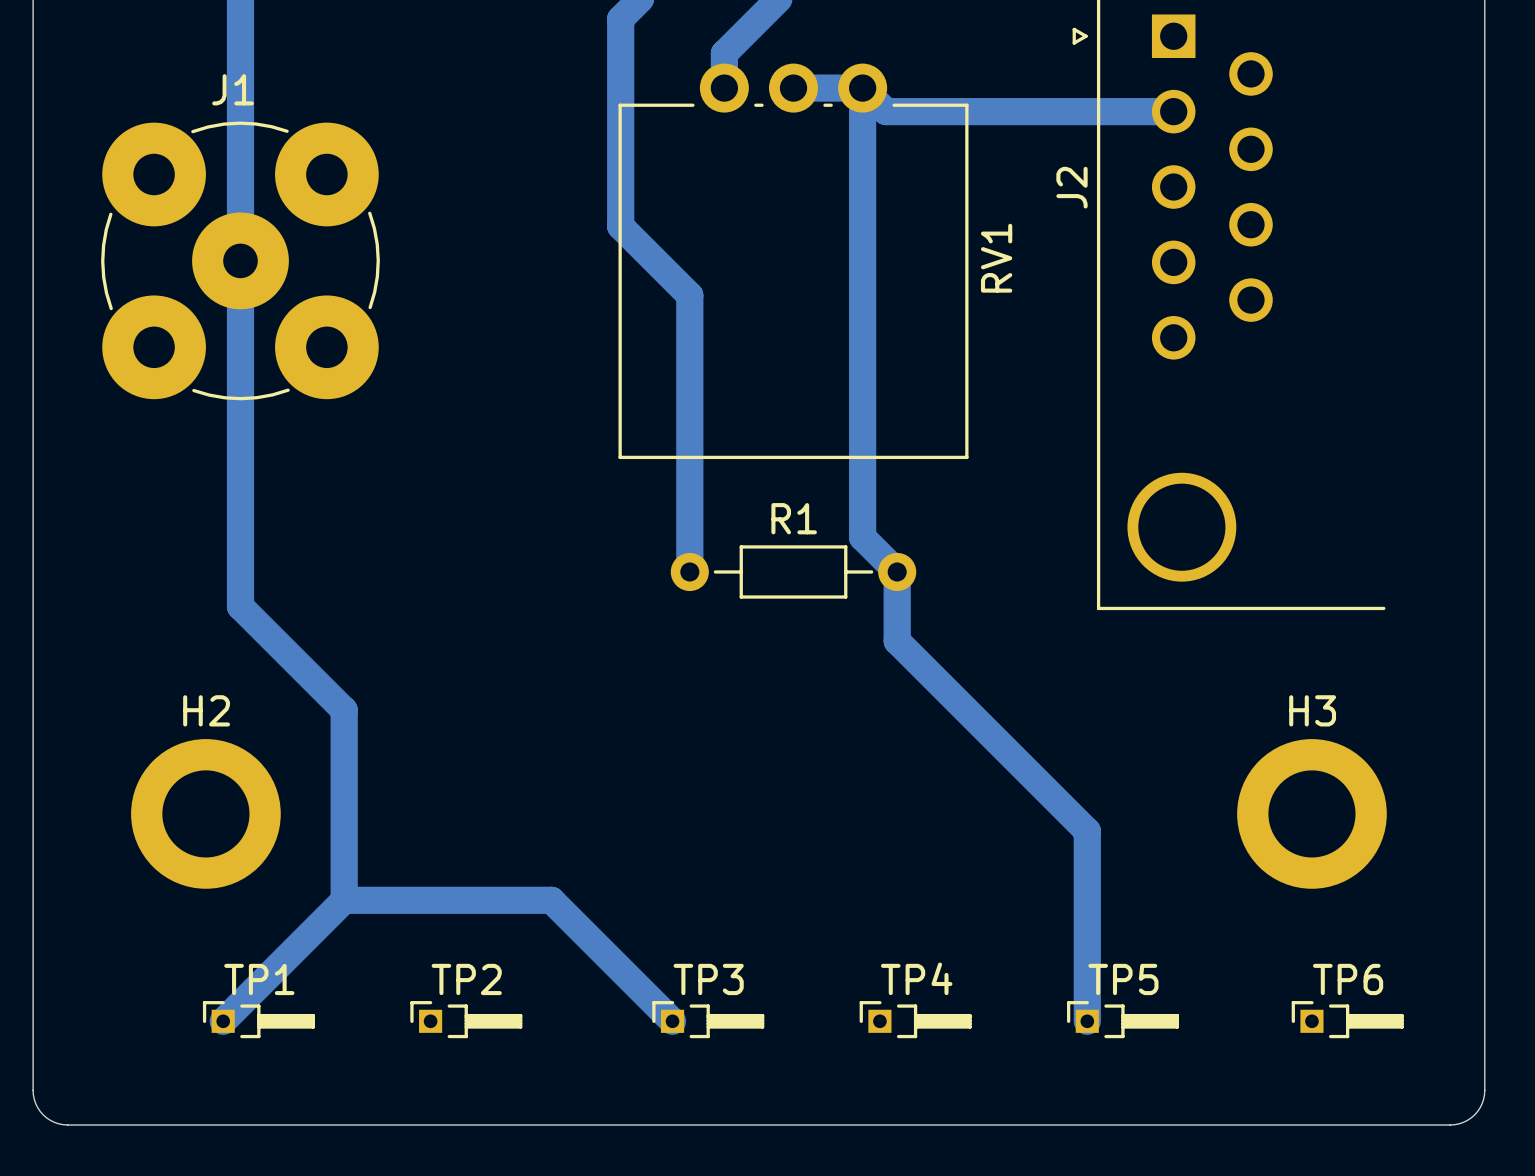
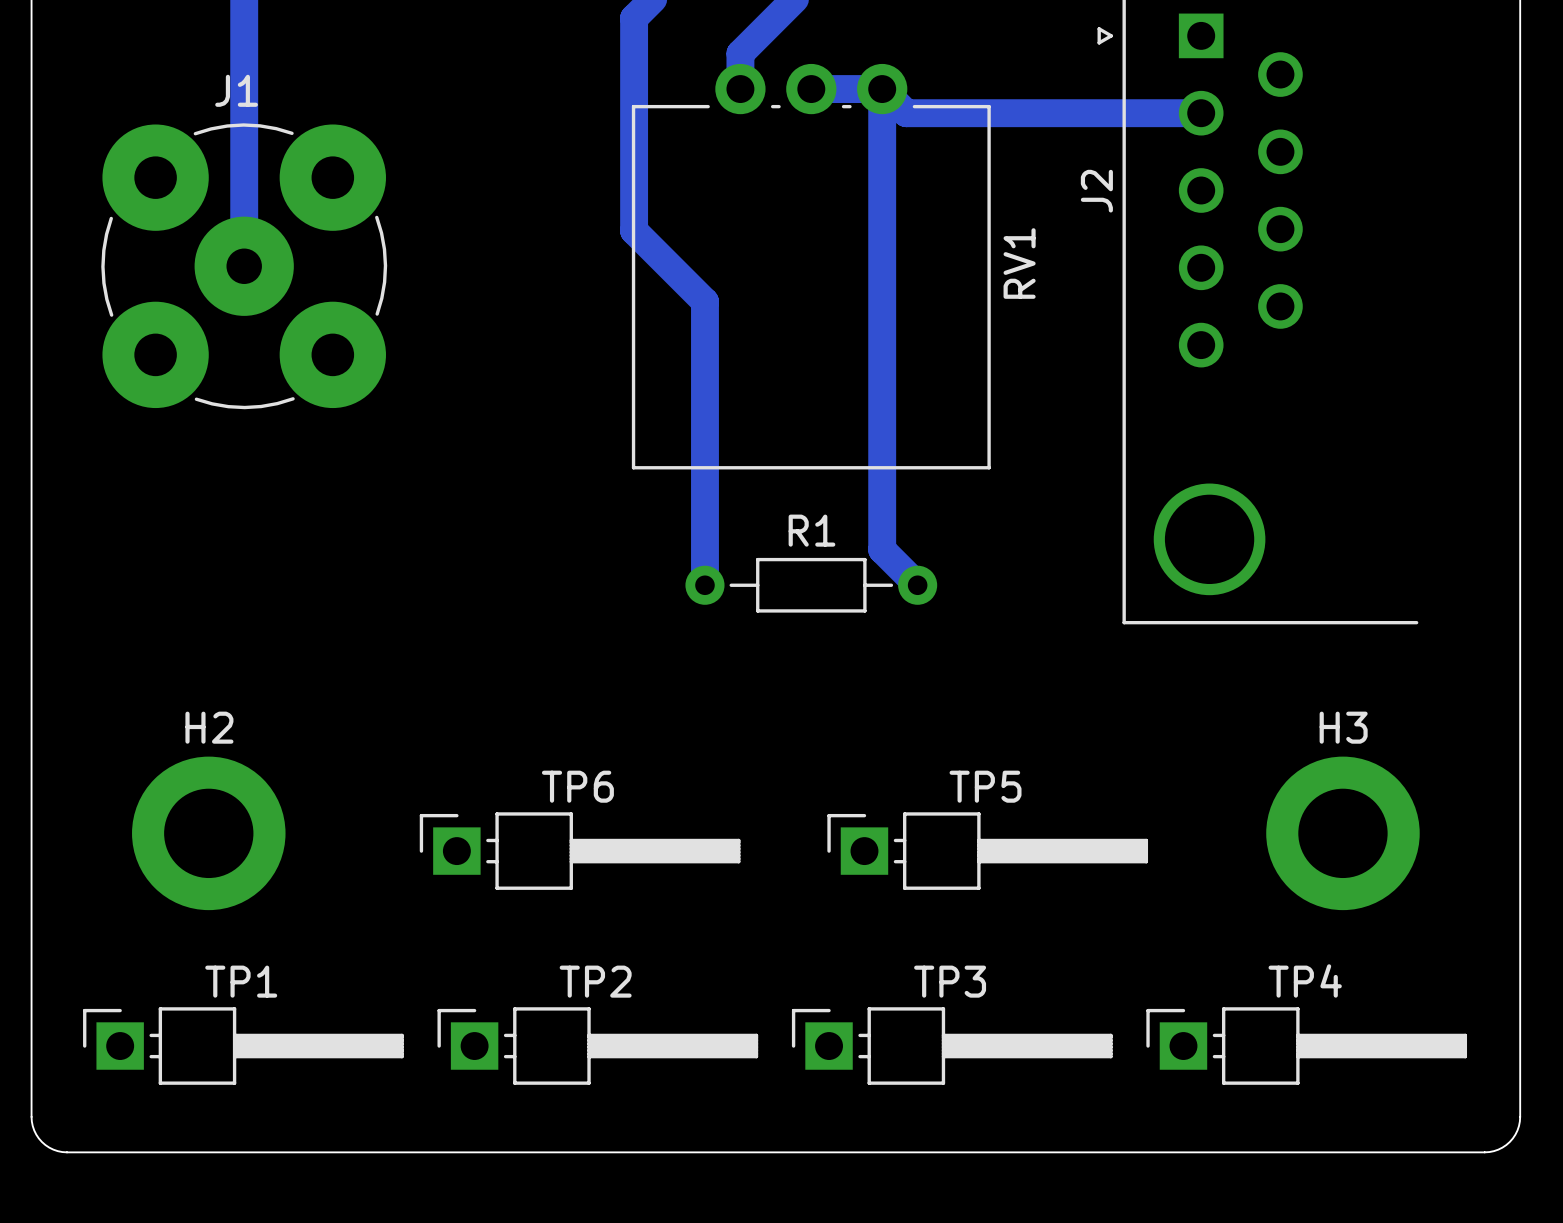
bottom track: (240, 260) (240, 606) (344, 710) (344, 900) -> none
bottom track: (897, 571) (897, 641) (1087, 831) (1087, 1021) -> none
bottom track: (344, 900) (223, 1021) -> none
bottom track: (344, 900) (551, 900) (672, 1021) -> none
TP1 footprint: [202, 1001, 315, 1039] -> [83, 1007, 404, 1085]
TP2 footprint: [410, 1001, 523, 1039] -> [437, 1007, 759, 1085]
TP3 footprint: [652, 1001, 765, 1039] -> [791, 1007, 1113, 1085]
TP4 footprint: [859, 1001, 972, 1039] -> [1146, 1007, 1468, 1085]
TP5 footprint: [1067, 1001, 1180, 1039] -> [827, 812, 1149, 890]
TP6 footprint: [1291, 1001, 1404, 1039] -> [419, 812, 741, 890]

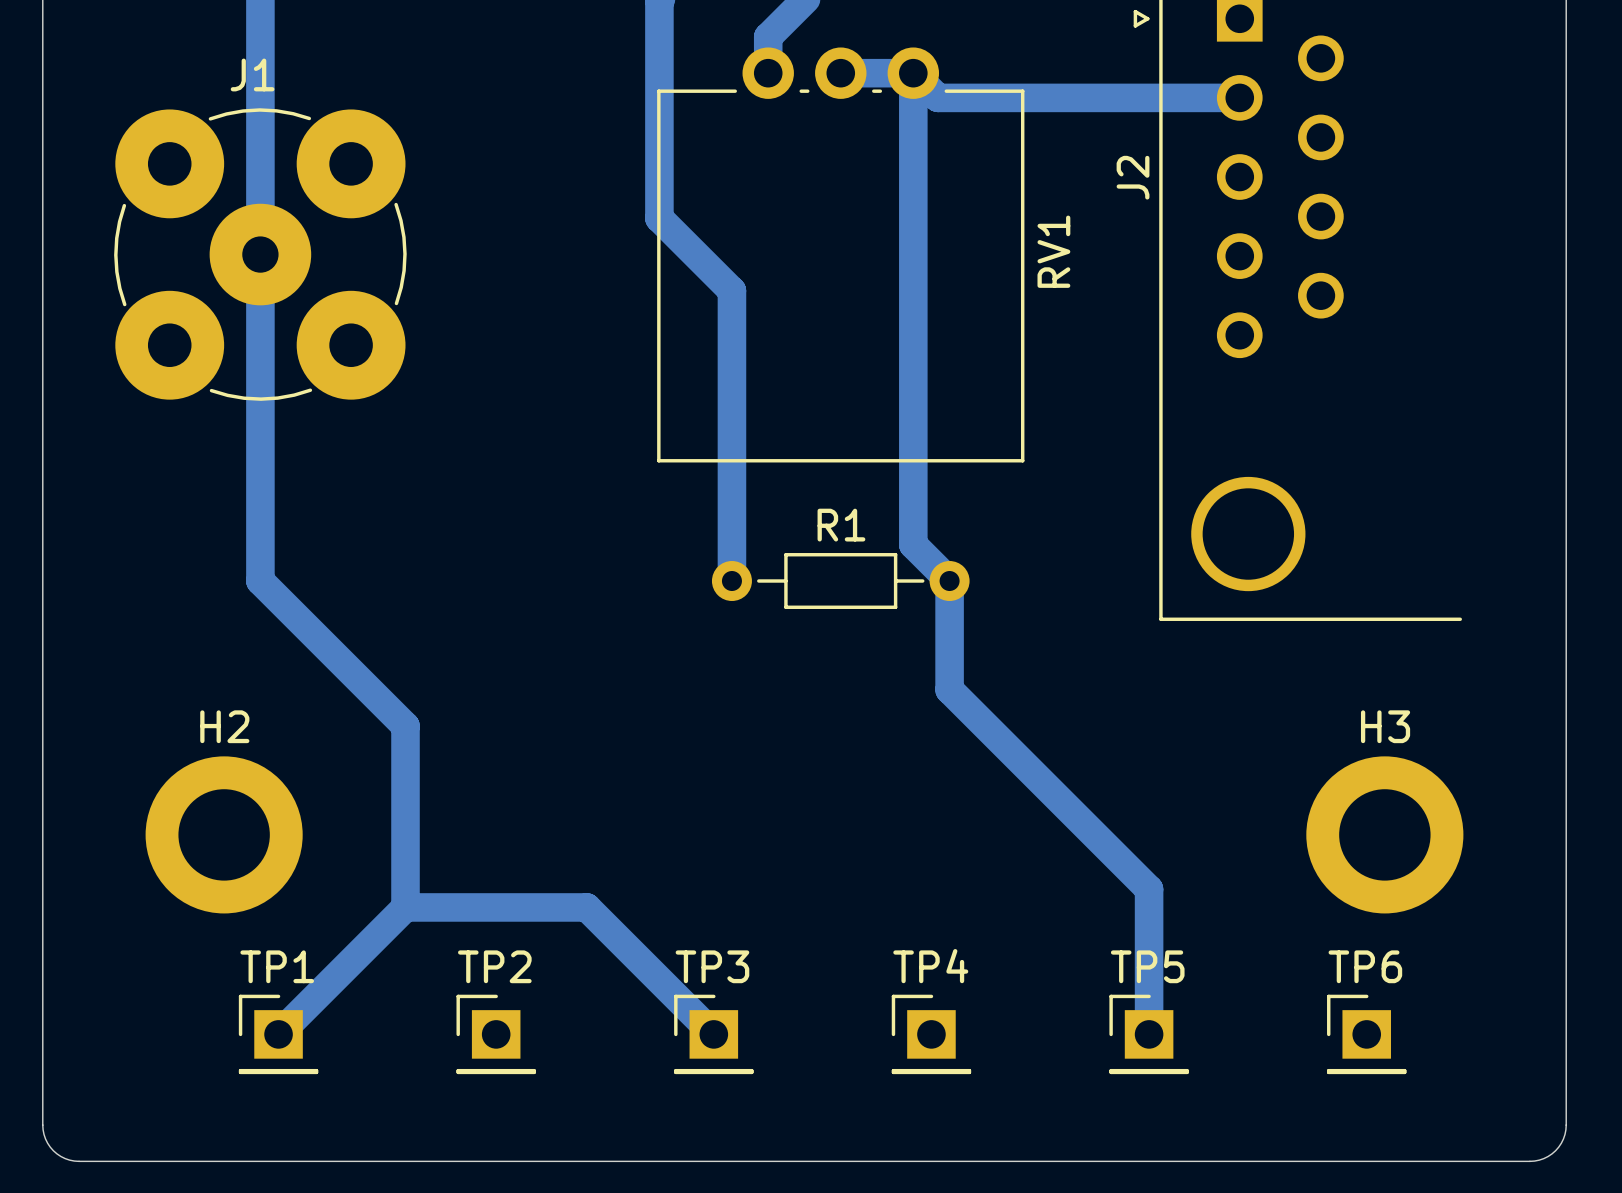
bottom track: none -> (260, 254) (260, 581) (405, 726) (405, 907)
bottom track: none -> (949, 581) (949, 689) (1149, 889) (1149, 1034)
TP6 footprint: [419, 812, 741, 890] -> [1327, 994, 1407, 1075]
TP5 footprint: [827, 812, 1149, 890] -> [1109, 994, 1189, 1075]
bottom track: none -> (405, 907) (278, 1034)
bottom track: none -> (405, 907) (586, 907) (713, 1034)
TP1 footprint: [83, 1007, 404, 1085] -> [238, 994, 319, 1075]
TP2 footprint: [437, 1007, 759, 1085] -> [456, 994, 536, 1075]
TP3 footprint: [791, 1007, 1113, 1085] -> [674, 994, 754, 1075]
TP4 footprint: [1146, 1007, 1468, 1085] -> [891, 994, 972, 1075]

